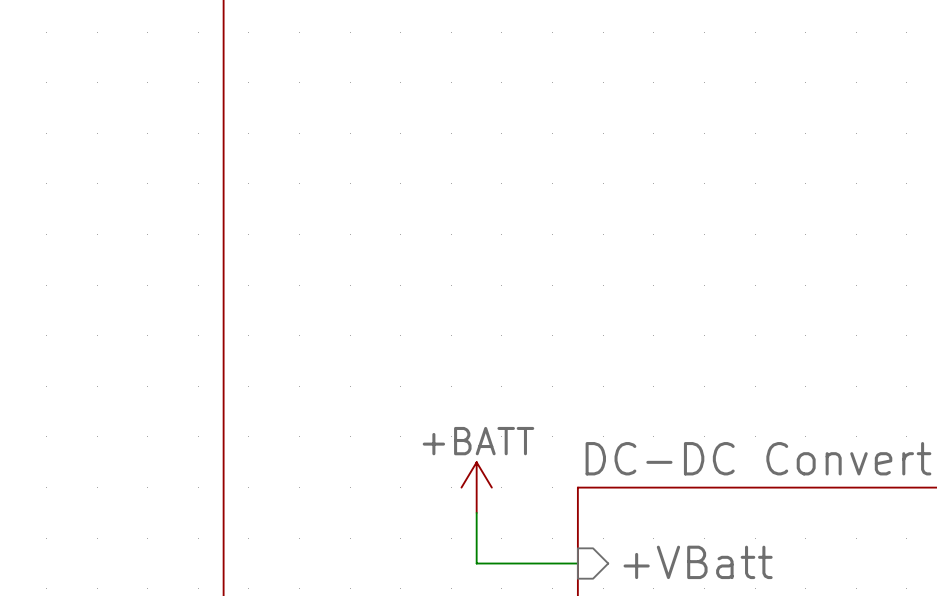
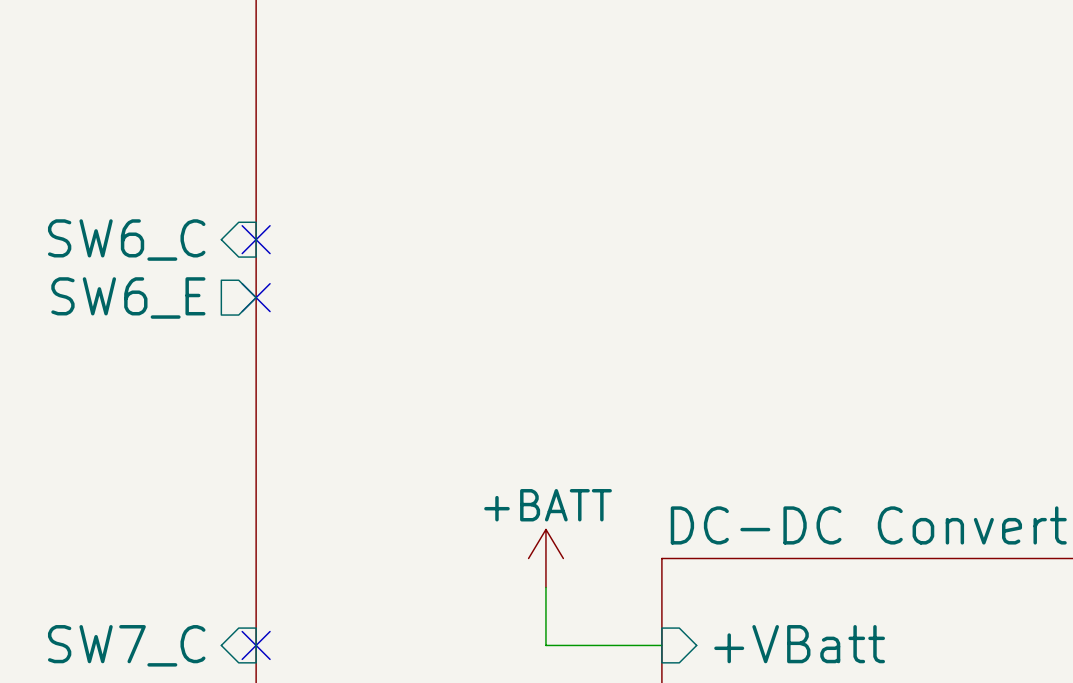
sheet pin: none -> SW6_C (126, 240)
no-connect mark: none -> (256, 239)
no-connect mark: none -> (256, 297)
sheet pin: none -> SW6_E (128, 297)
sheet pin: none -> SW7_C (126, 645)
no-connect mark: none -> (256, 645)

